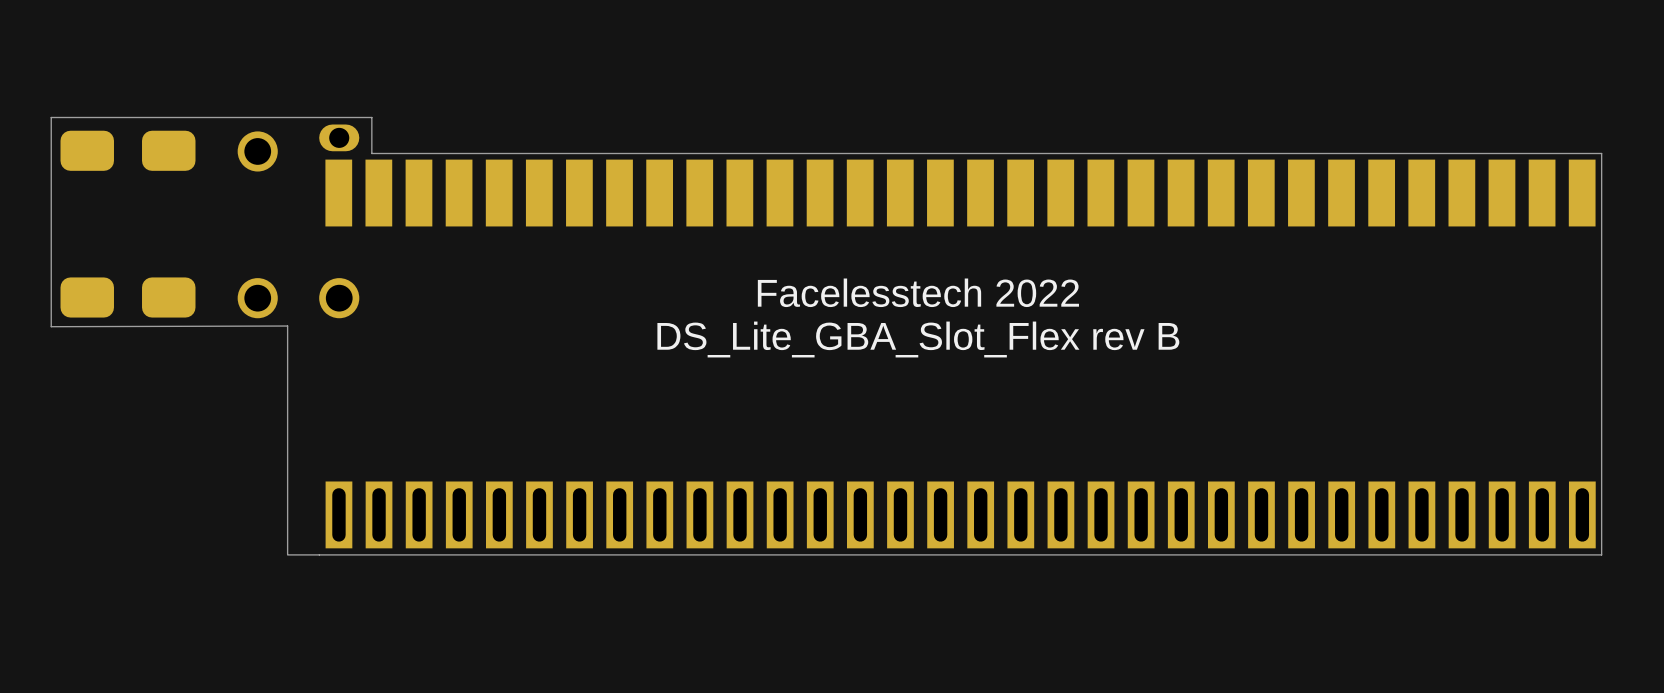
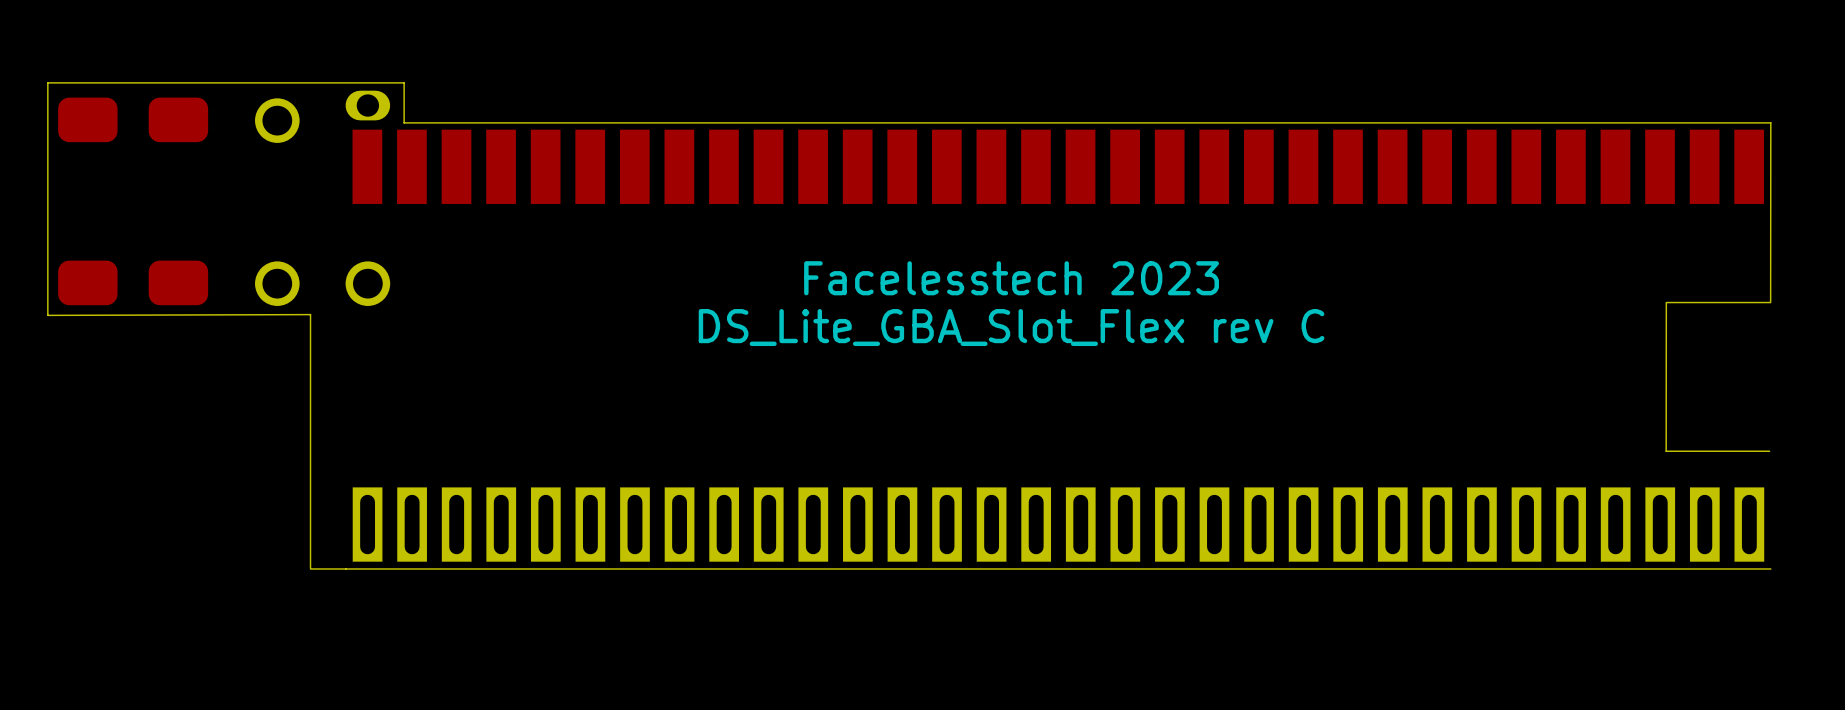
board edge: (1601, 153) (1601, 554) -> (1770, 122) (1770, 302)
text: Facelesstech 2022 (918, 292) -> Facelesstech 2023 (1011, 278)
board edge: none -> (1666, 302) (1666, 451) (1769, 451)
board edge: none -> (1666, 302) (1770, 302)
text: DS_Lite_GBA_Slot_Flex rev B (918, 339) -> DS_Lite_GBA_Slot_Flex rev C (1011, 327)

